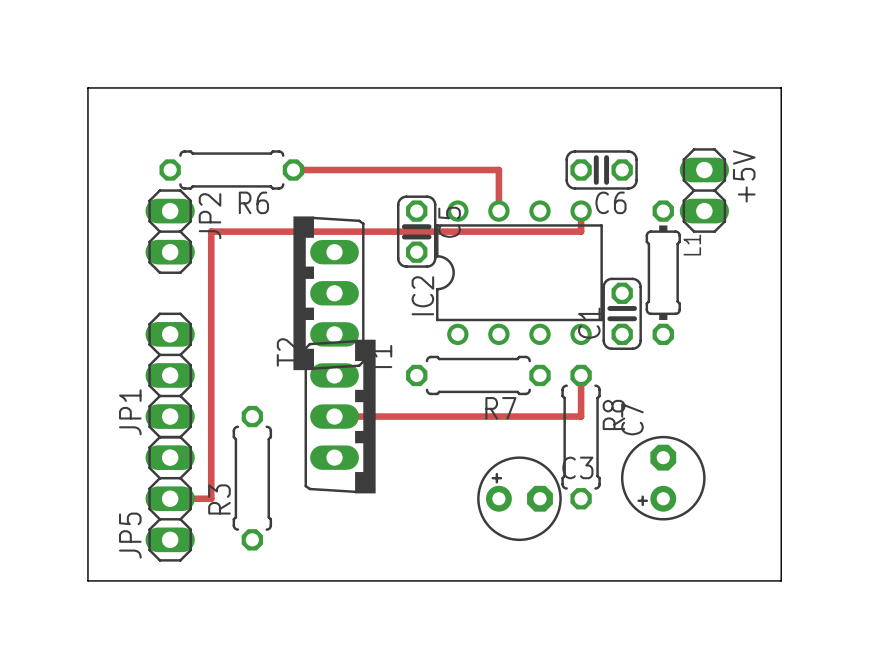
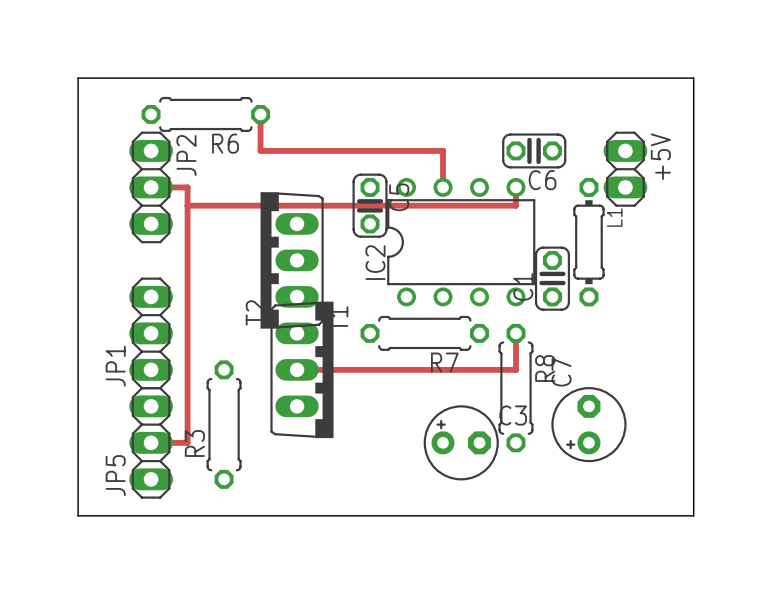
track: none -> (260, 114) (260, 150)
R6 position: (231, 169) -> (205, 114)
JP2 footprint: [145, 189, 195, 274] -> [129, 131, 173, 244]
track: none -> (151, 187) (187, 187) (187, 205)

